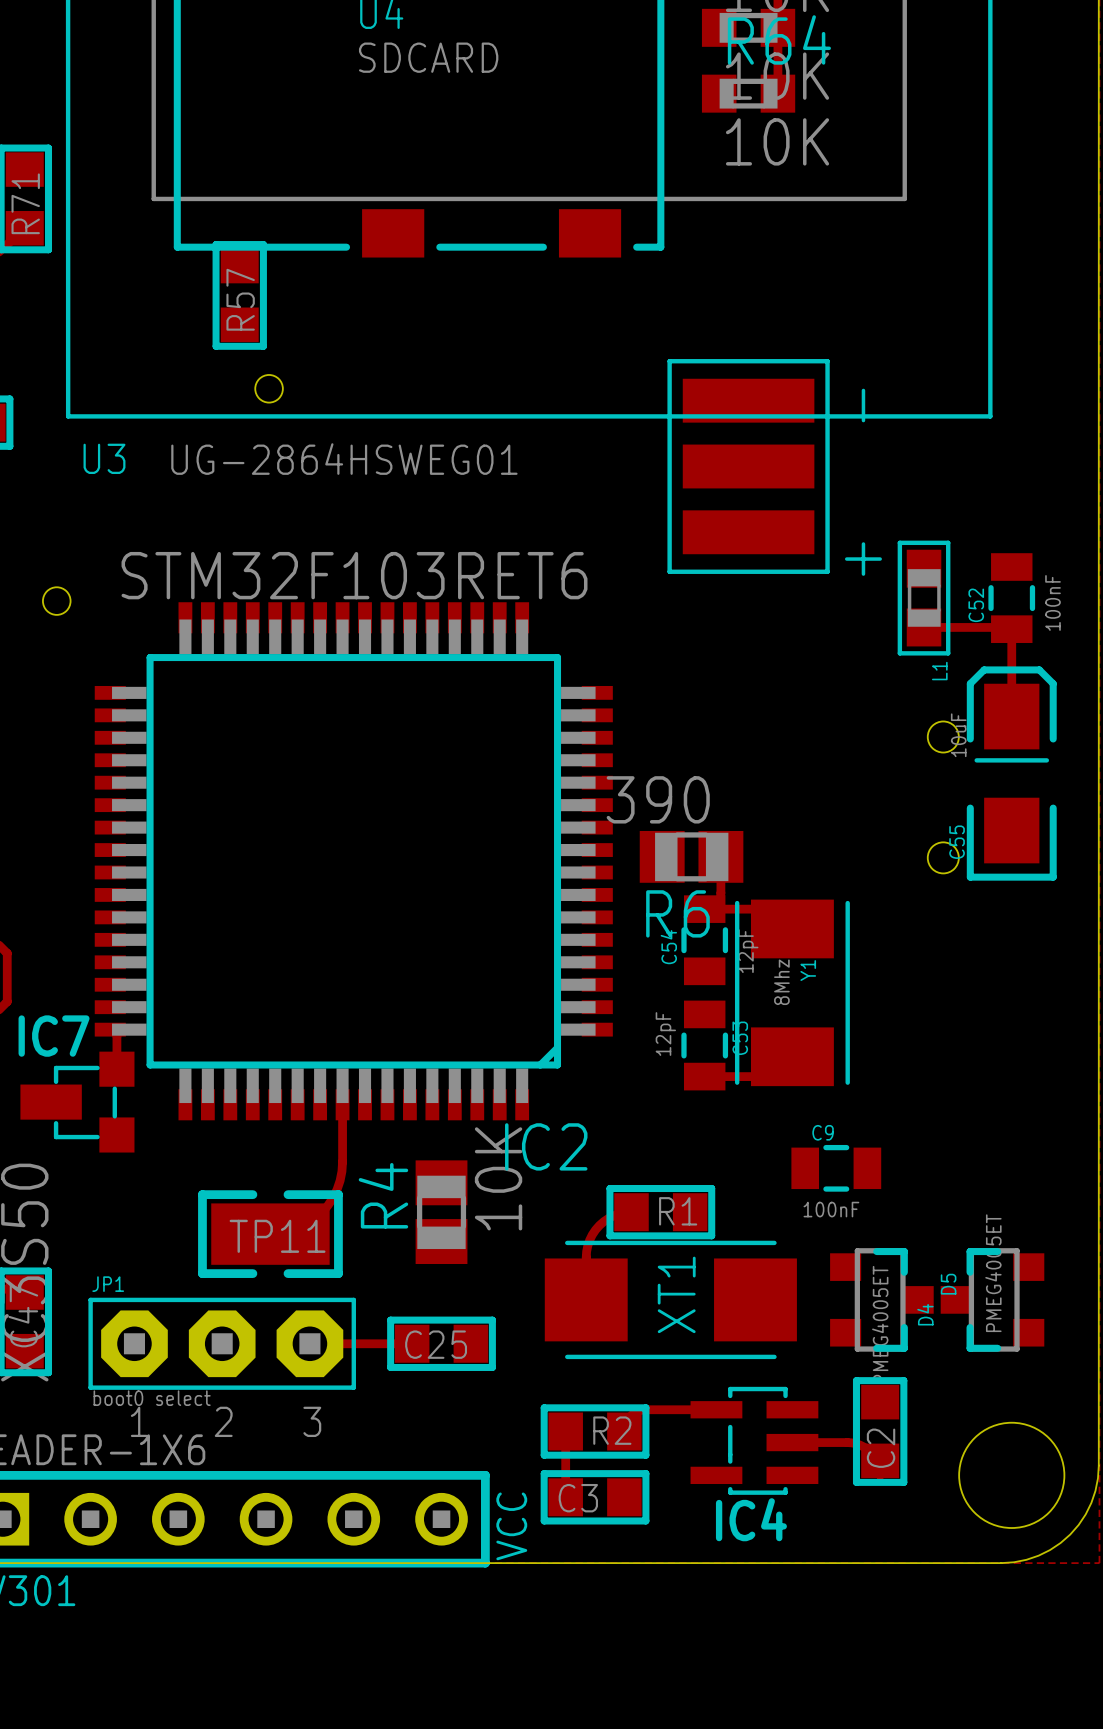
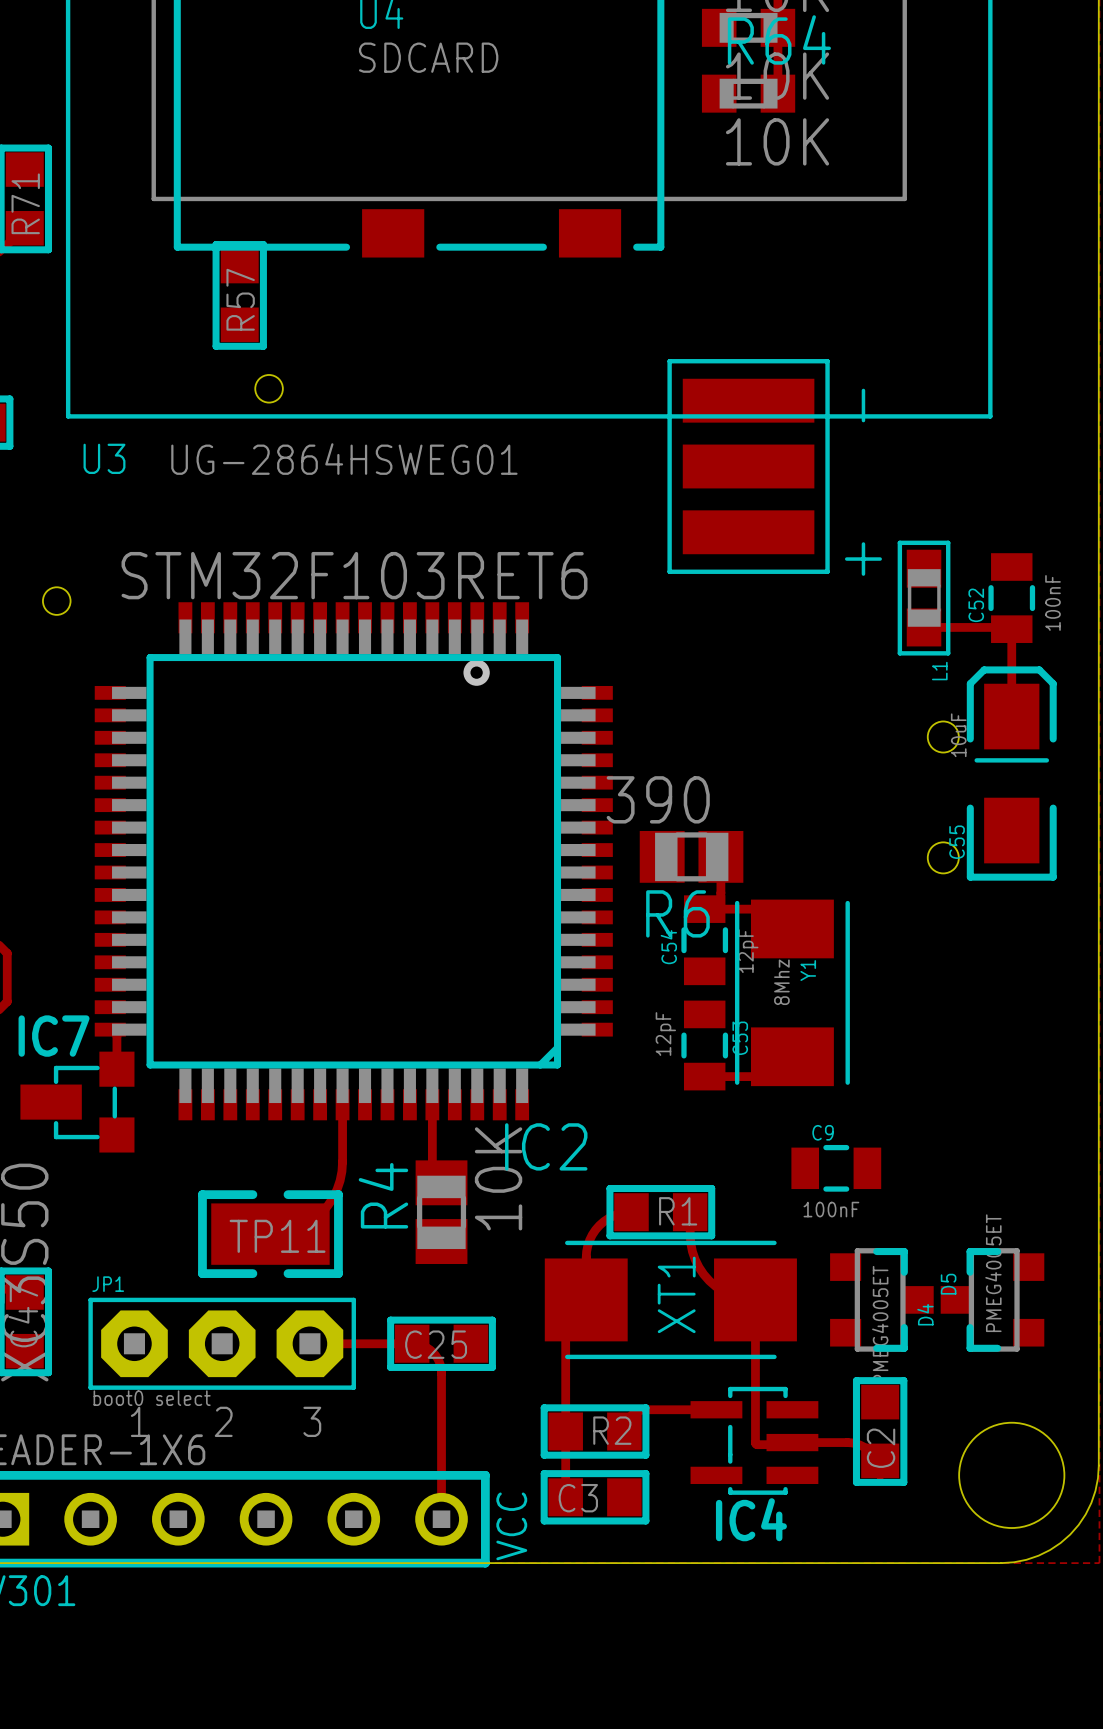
via: none -> (476, 672)
track: none -> (432, 1104) (432, 1174) (435, 1180) (441, 1182)
track: none -> (690, 1212) (692, 1251) (703, 1274) (715, 1286) (730, 1294) (755, 1299) (755, 1443) (790, 1444) (792, 1442)
track: none -> (586, 1299) (565, 1299) (565, 1431)
track: none -> (412, 1343) (423, 1346) (432, 1352) (441, 1369) (441, 1519)

